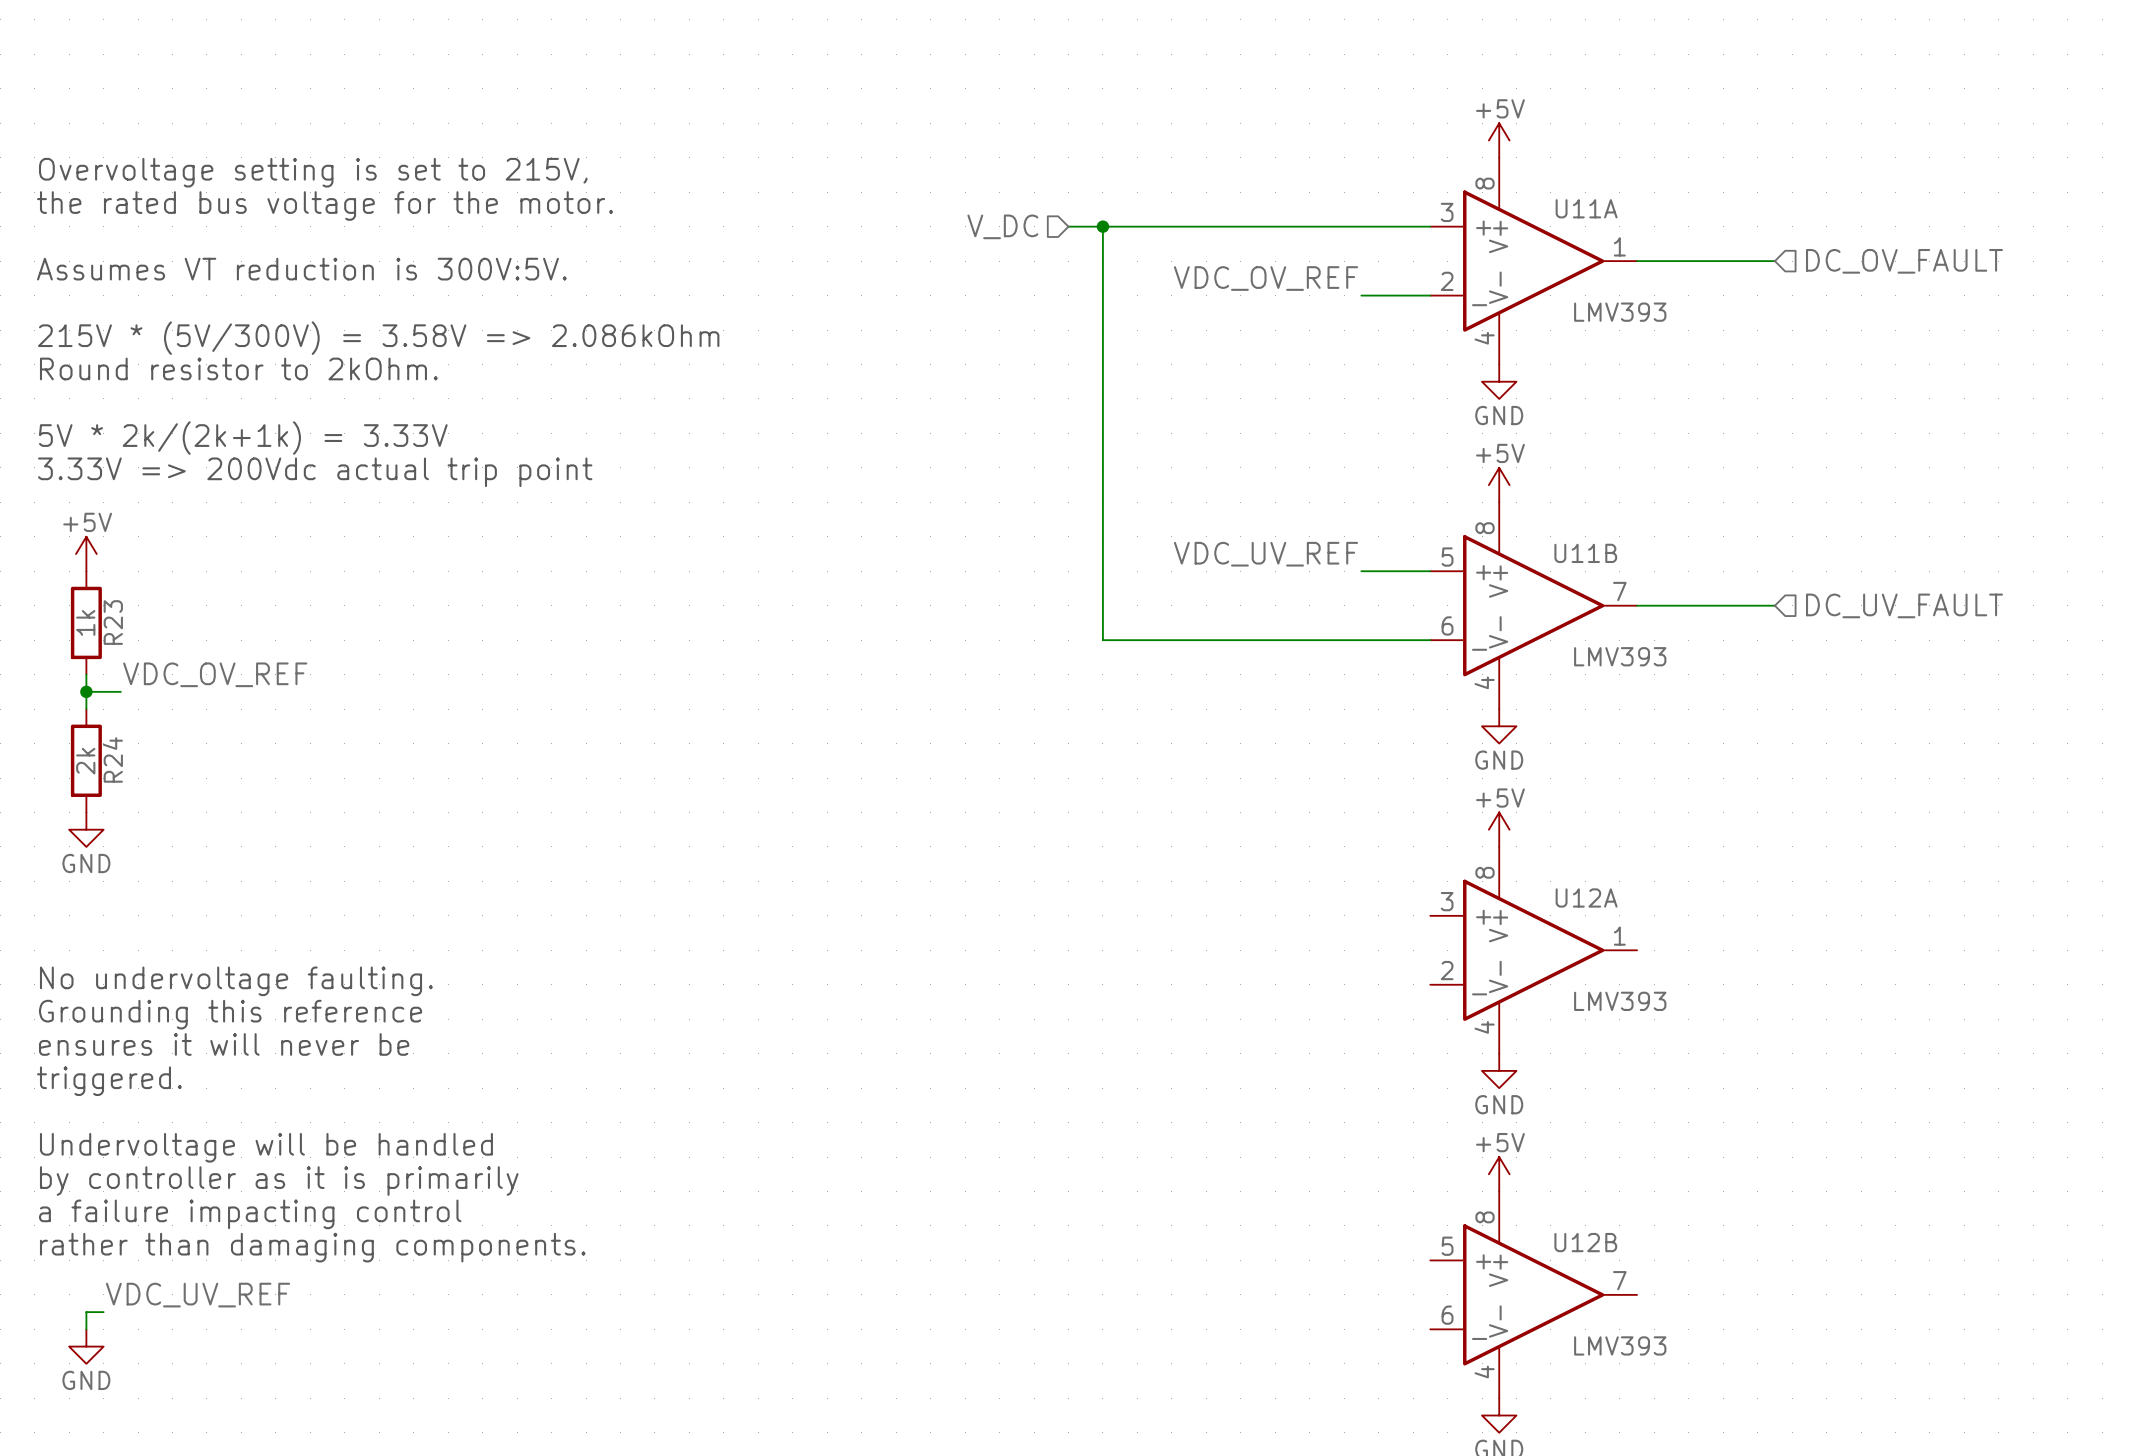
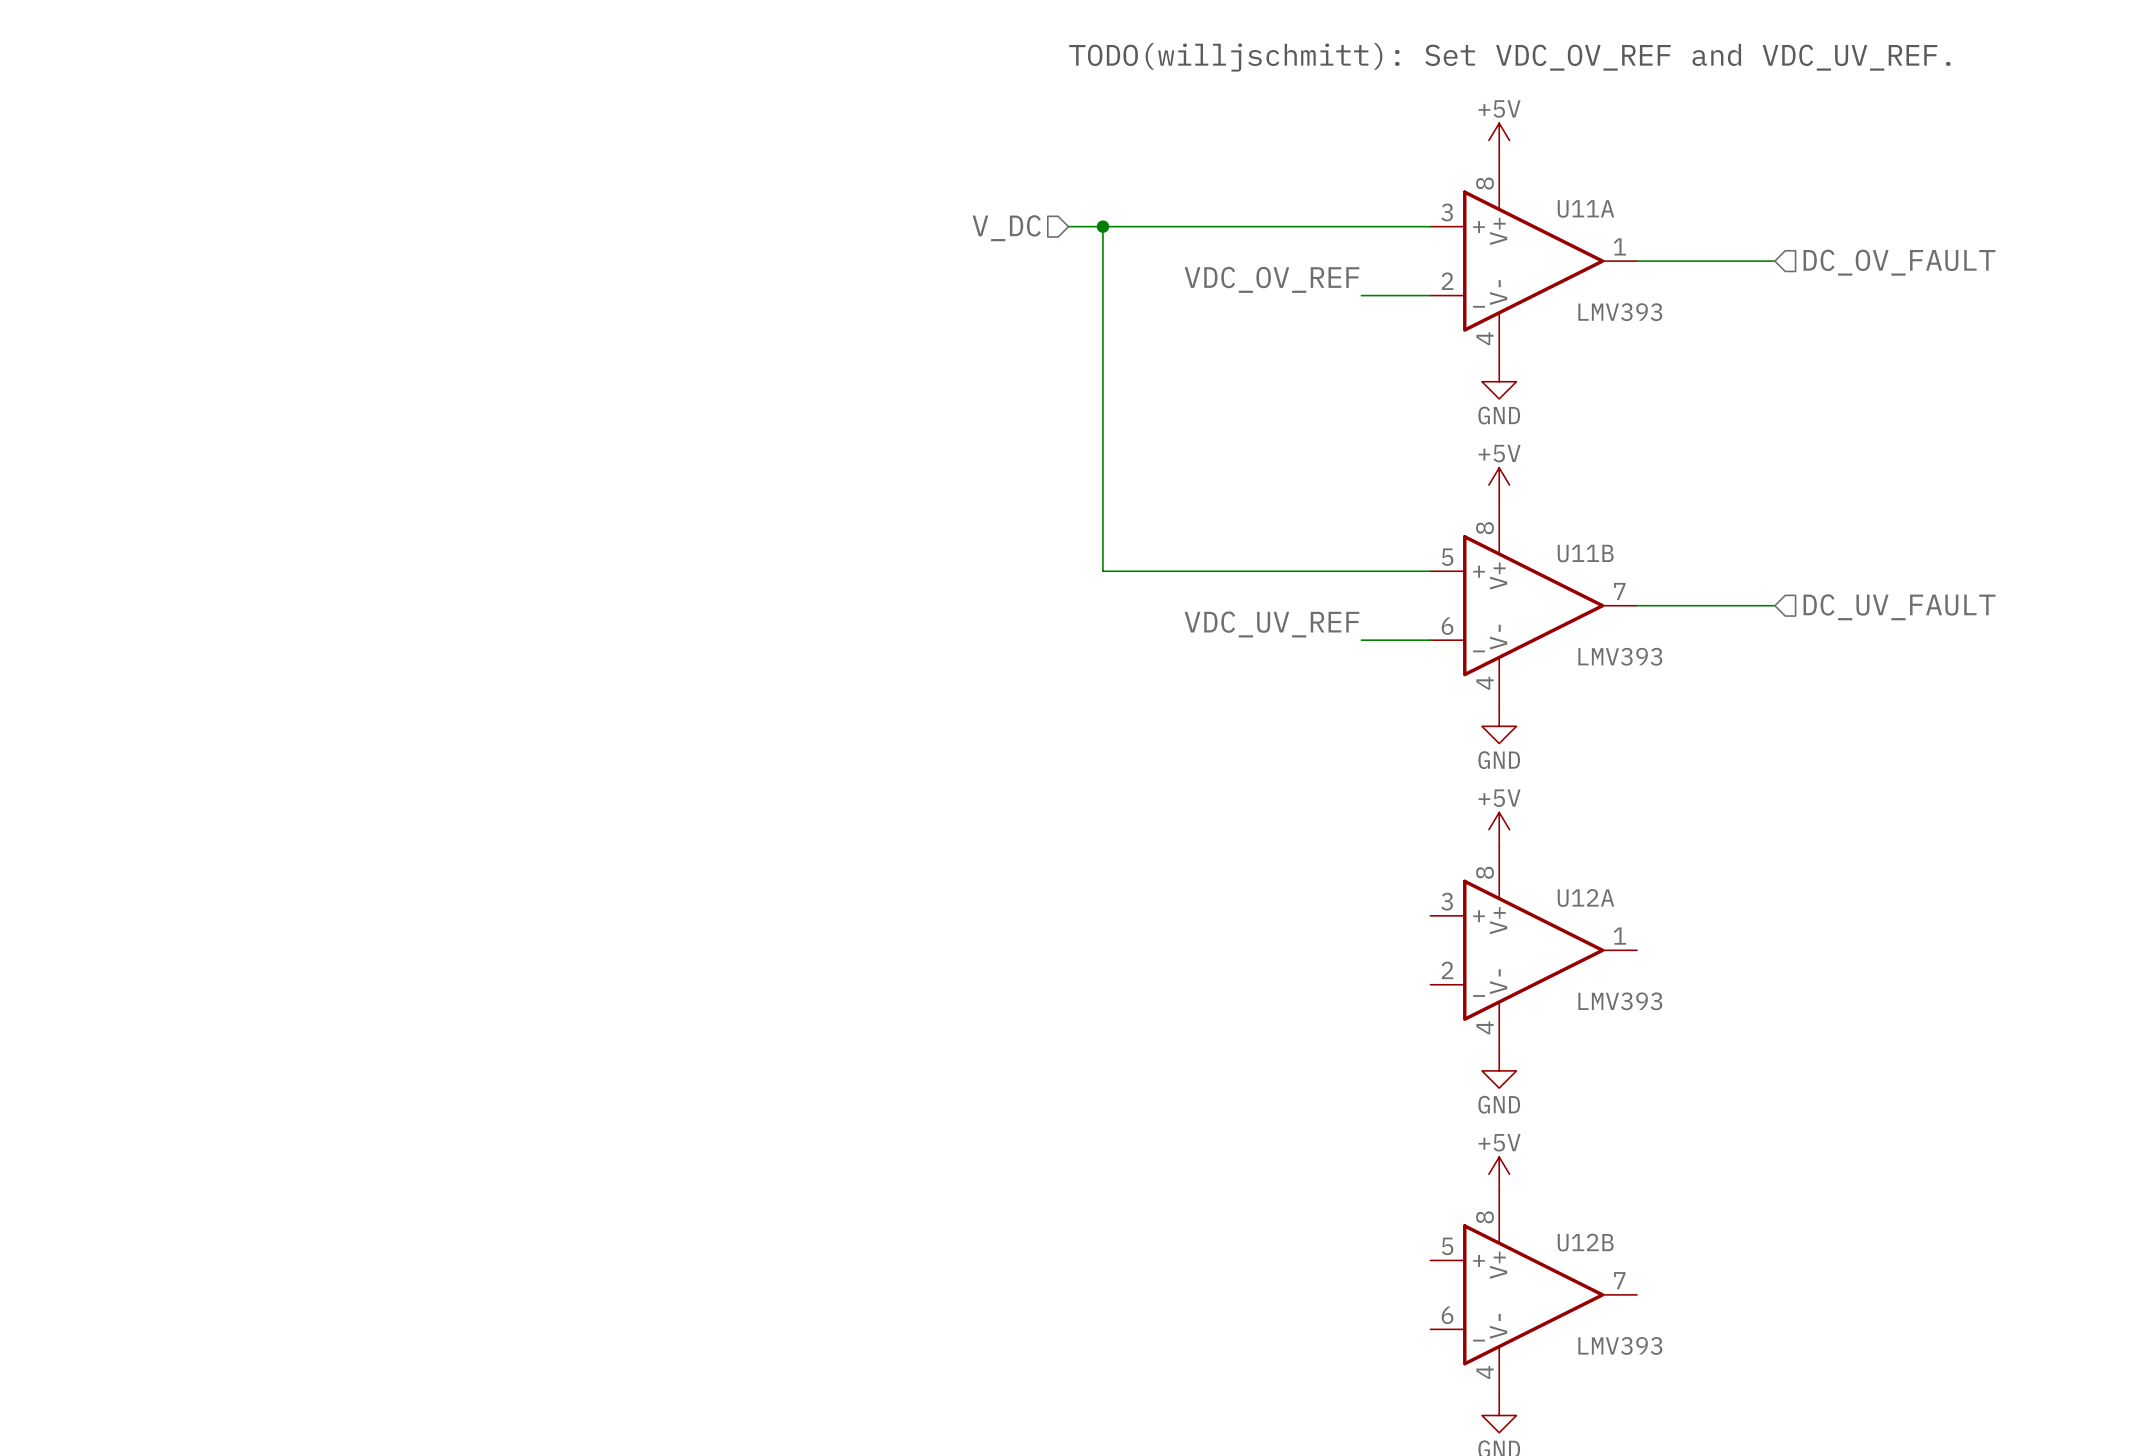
text: none -> TODO(willjschmitt): Set VDC_OV_REF and VDC_UV_REF. (1509, 57)
text: Overvoltage setting is set to 215V, (313, 172) -> none
text: the rated bus voltage for the motor. (325, 205) -> none
text: Assumes VT reduction is 300V:5V. (301, 269) -> none
text: 215V * (5V/300V) = 3.58V => 2.086kOhm (378, 338) -> none
text: Round resistor to 2kOhm. (238, 368) -> none
text: 5V * 2k/(2k+1k) = 3.33V (243, 438) -> none
text: 3.33V => 200Vdc actual trip point (315, 472) -> none
power symbol: +5V (86, 554) -> none
label position: VDC_UV_REF (1266, 554) -> VDC_UV_REF (1272, 624)
wire: (1102, 571) (1102, 640) (1361, 640) -> (1102, 571) (1361, 571)
R23: 1k (86, 622) -> none
wire: (86, 674) (86, 709) -> none
label: VDC_OV_REF (215, 674) -> none
wire: (86, 691) (120, 691) -> none
junction: (86, 691) -> none
R24: 2k (86, 760) -> none
power symbol: GND (86, 829) -> none
text: No undervoltage faulting. (236, 981) -> none
text: Grounding this reference (230, 1014) -> none
text: ensures it will never be (224, 1044) -> none
text: triggered. (109, 1081) -> none
text: Undervoltage will be handled (266, 1147) -> none
text: by controller as it is primarily (279, 1181) -> none
text: a failure impacting control (250, 1214) -> none
text: rather than damaging components. (312, 1247) -> none
label: VDC_UV_REF (198, 1295) -> none
wire: (103, 1312) (86, 1312) (86, 1329) -> none
power symbol: GND (86, 1346) -> none

